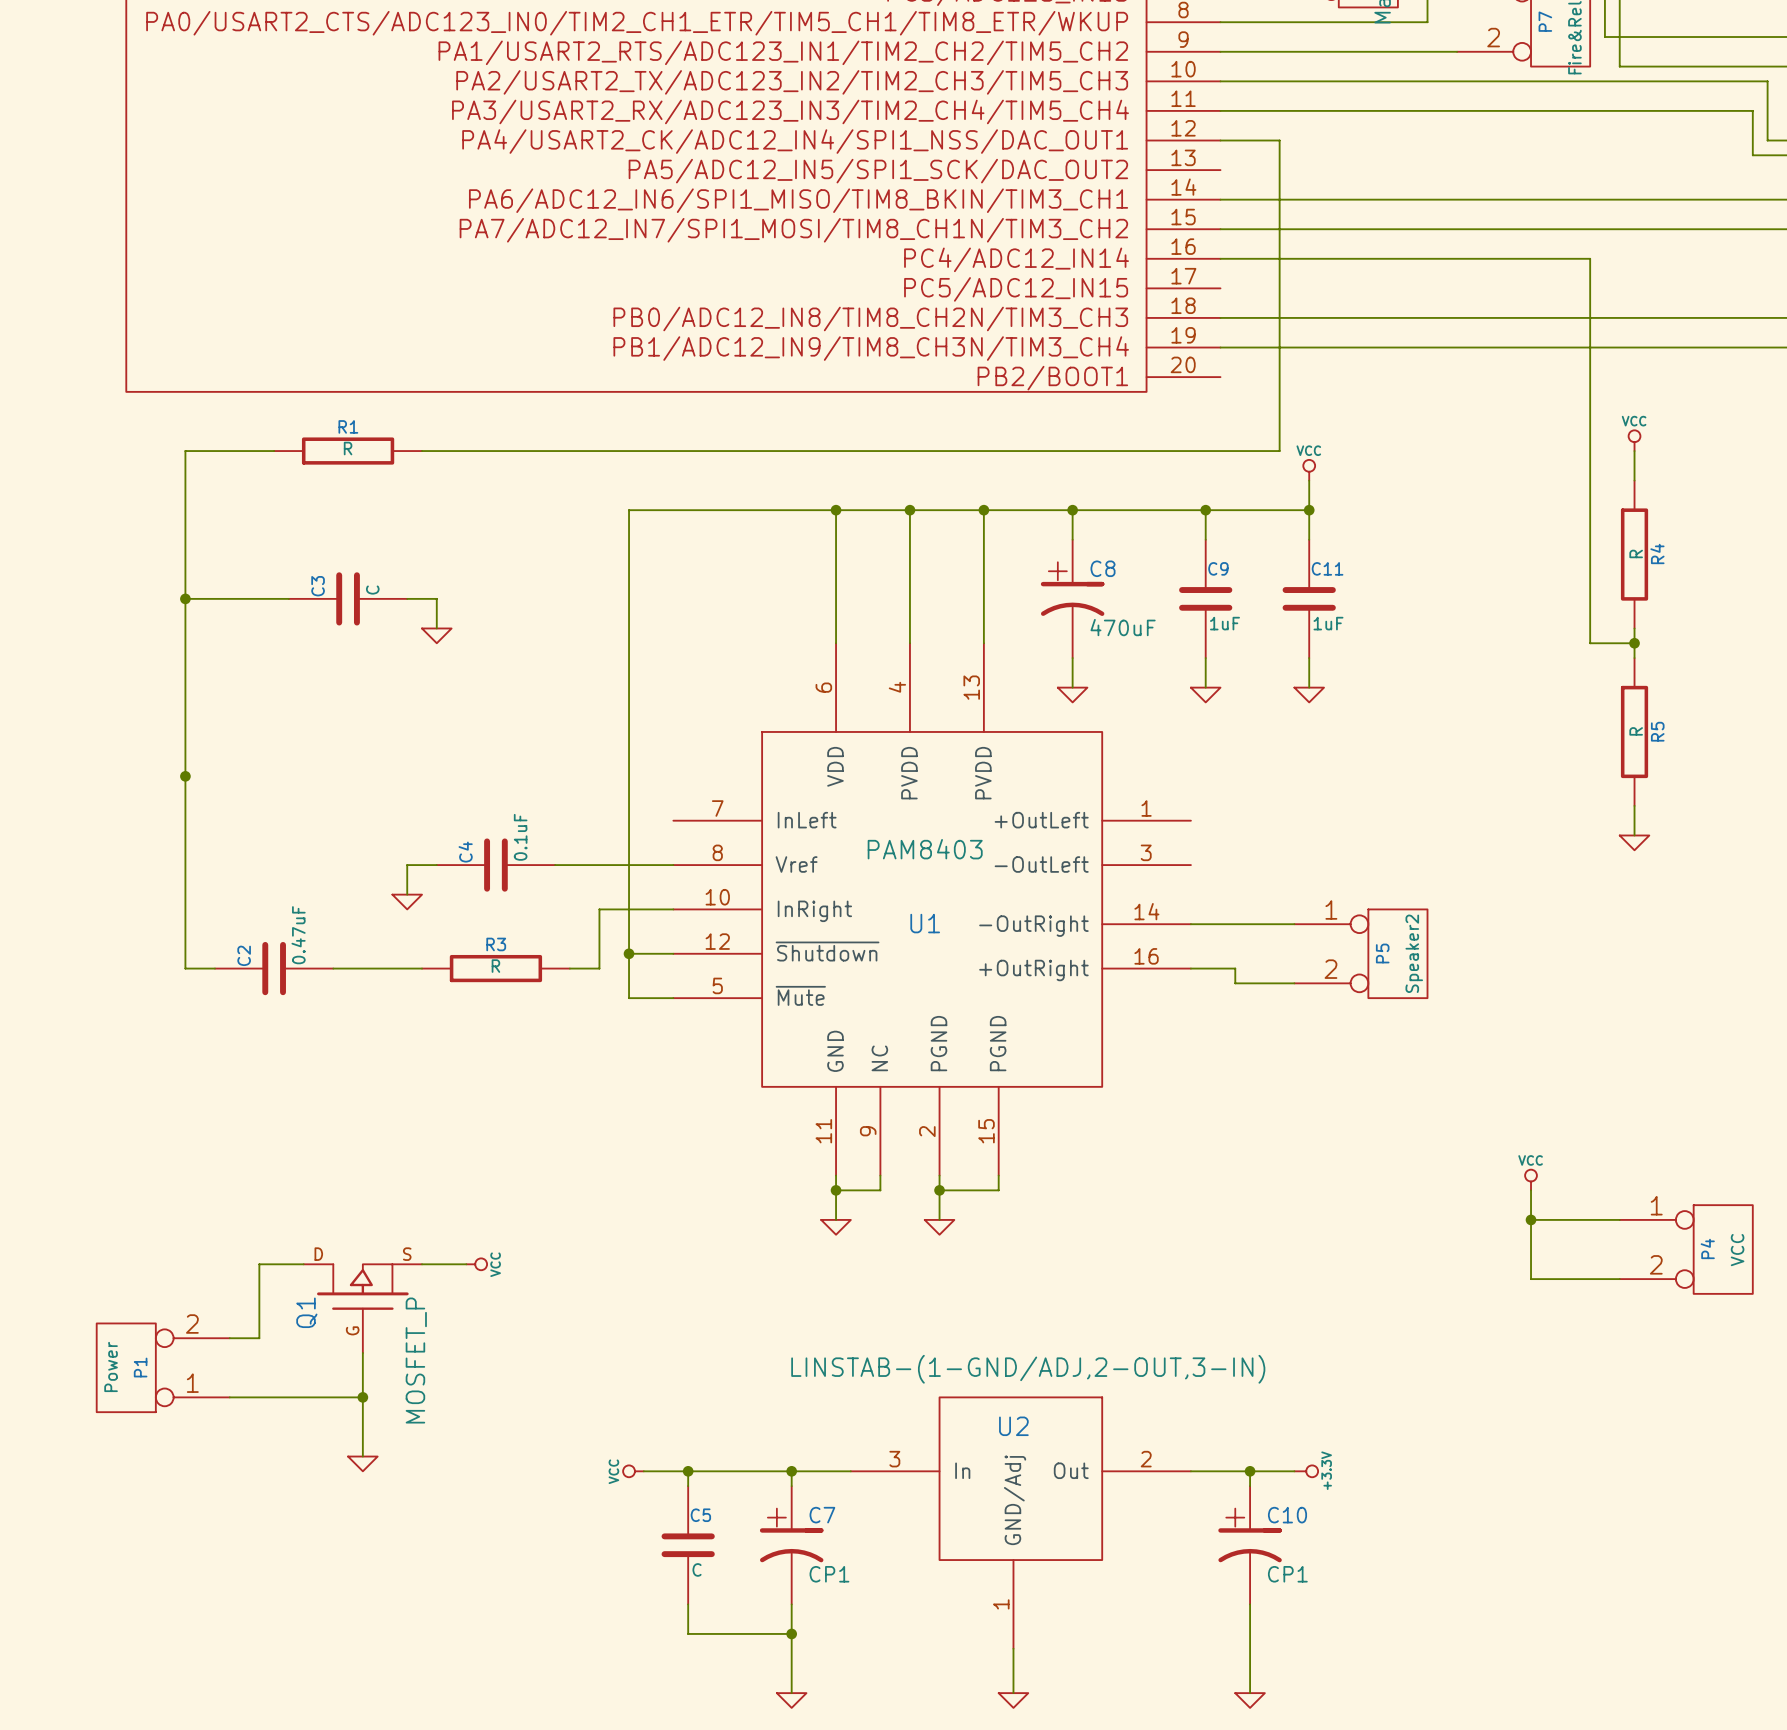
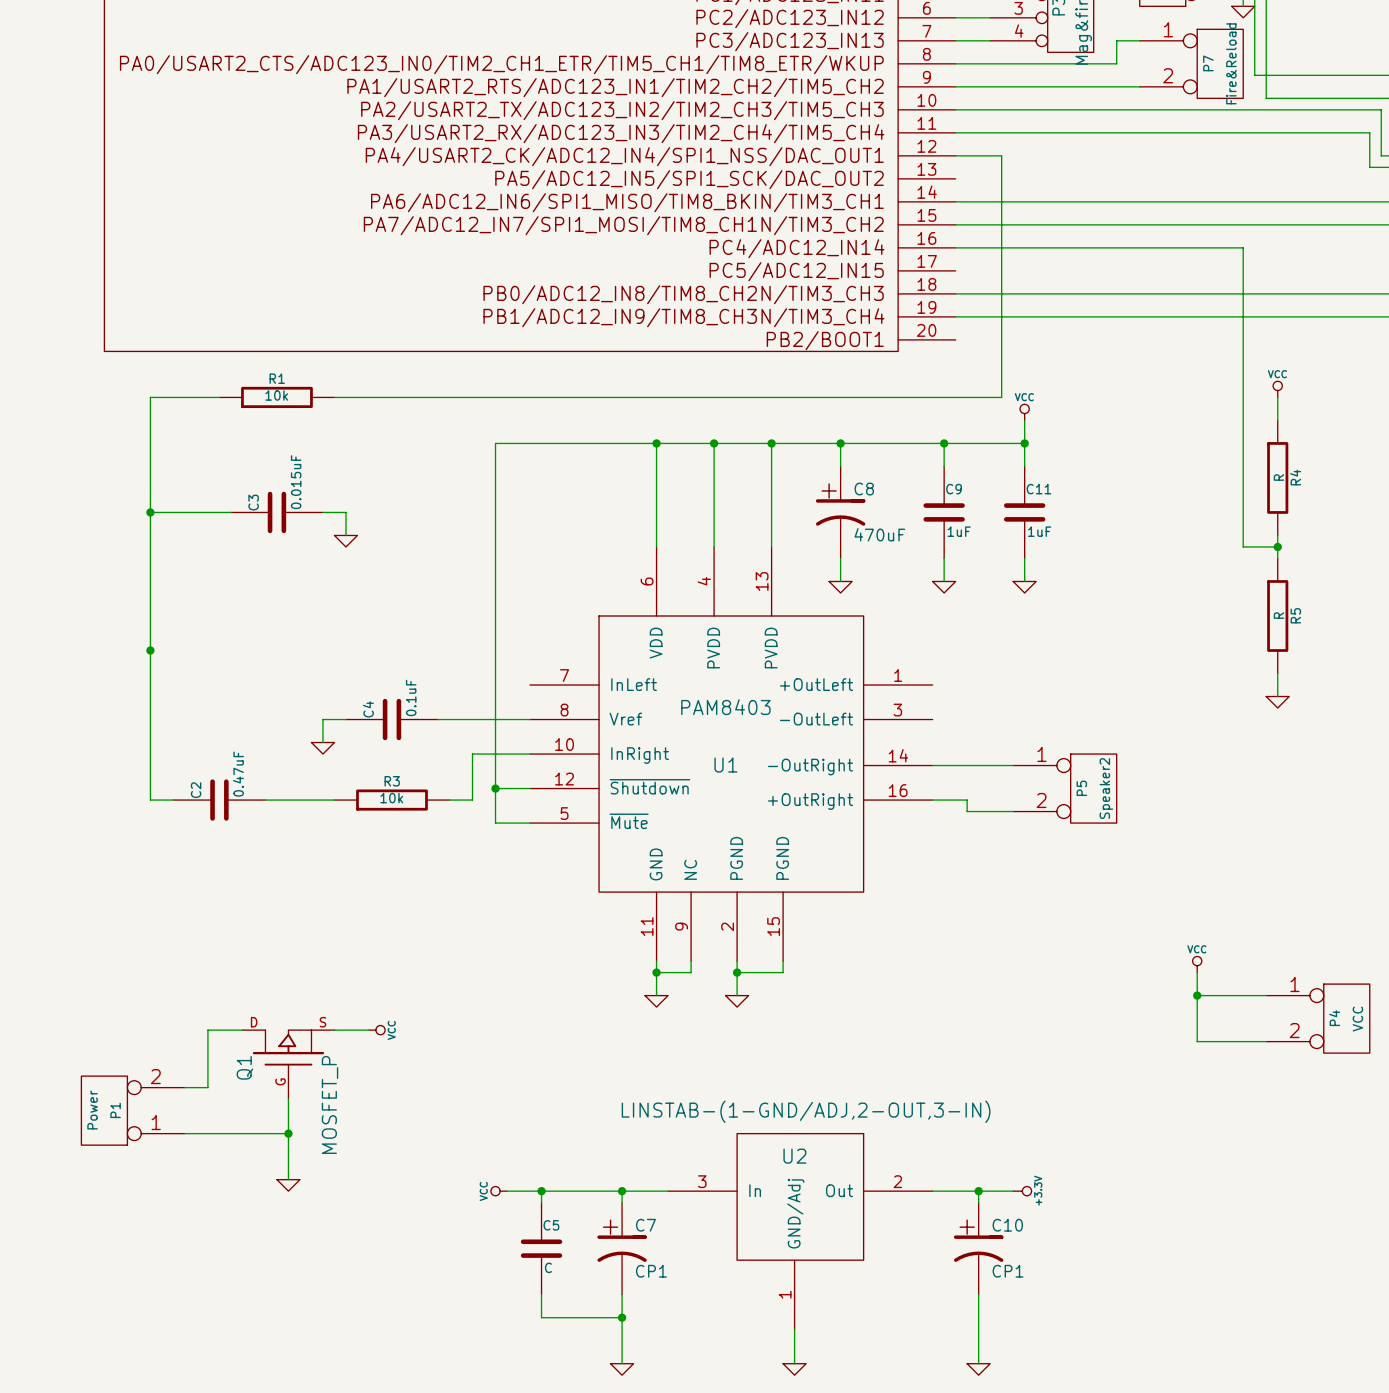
R1 value: R (348, 448) -> 10k (276, 395)
C3 value: C (372, 590) -> 0.015uF (296, 482)
R3 value: R (495, 966) -> 10k (391, 798)

